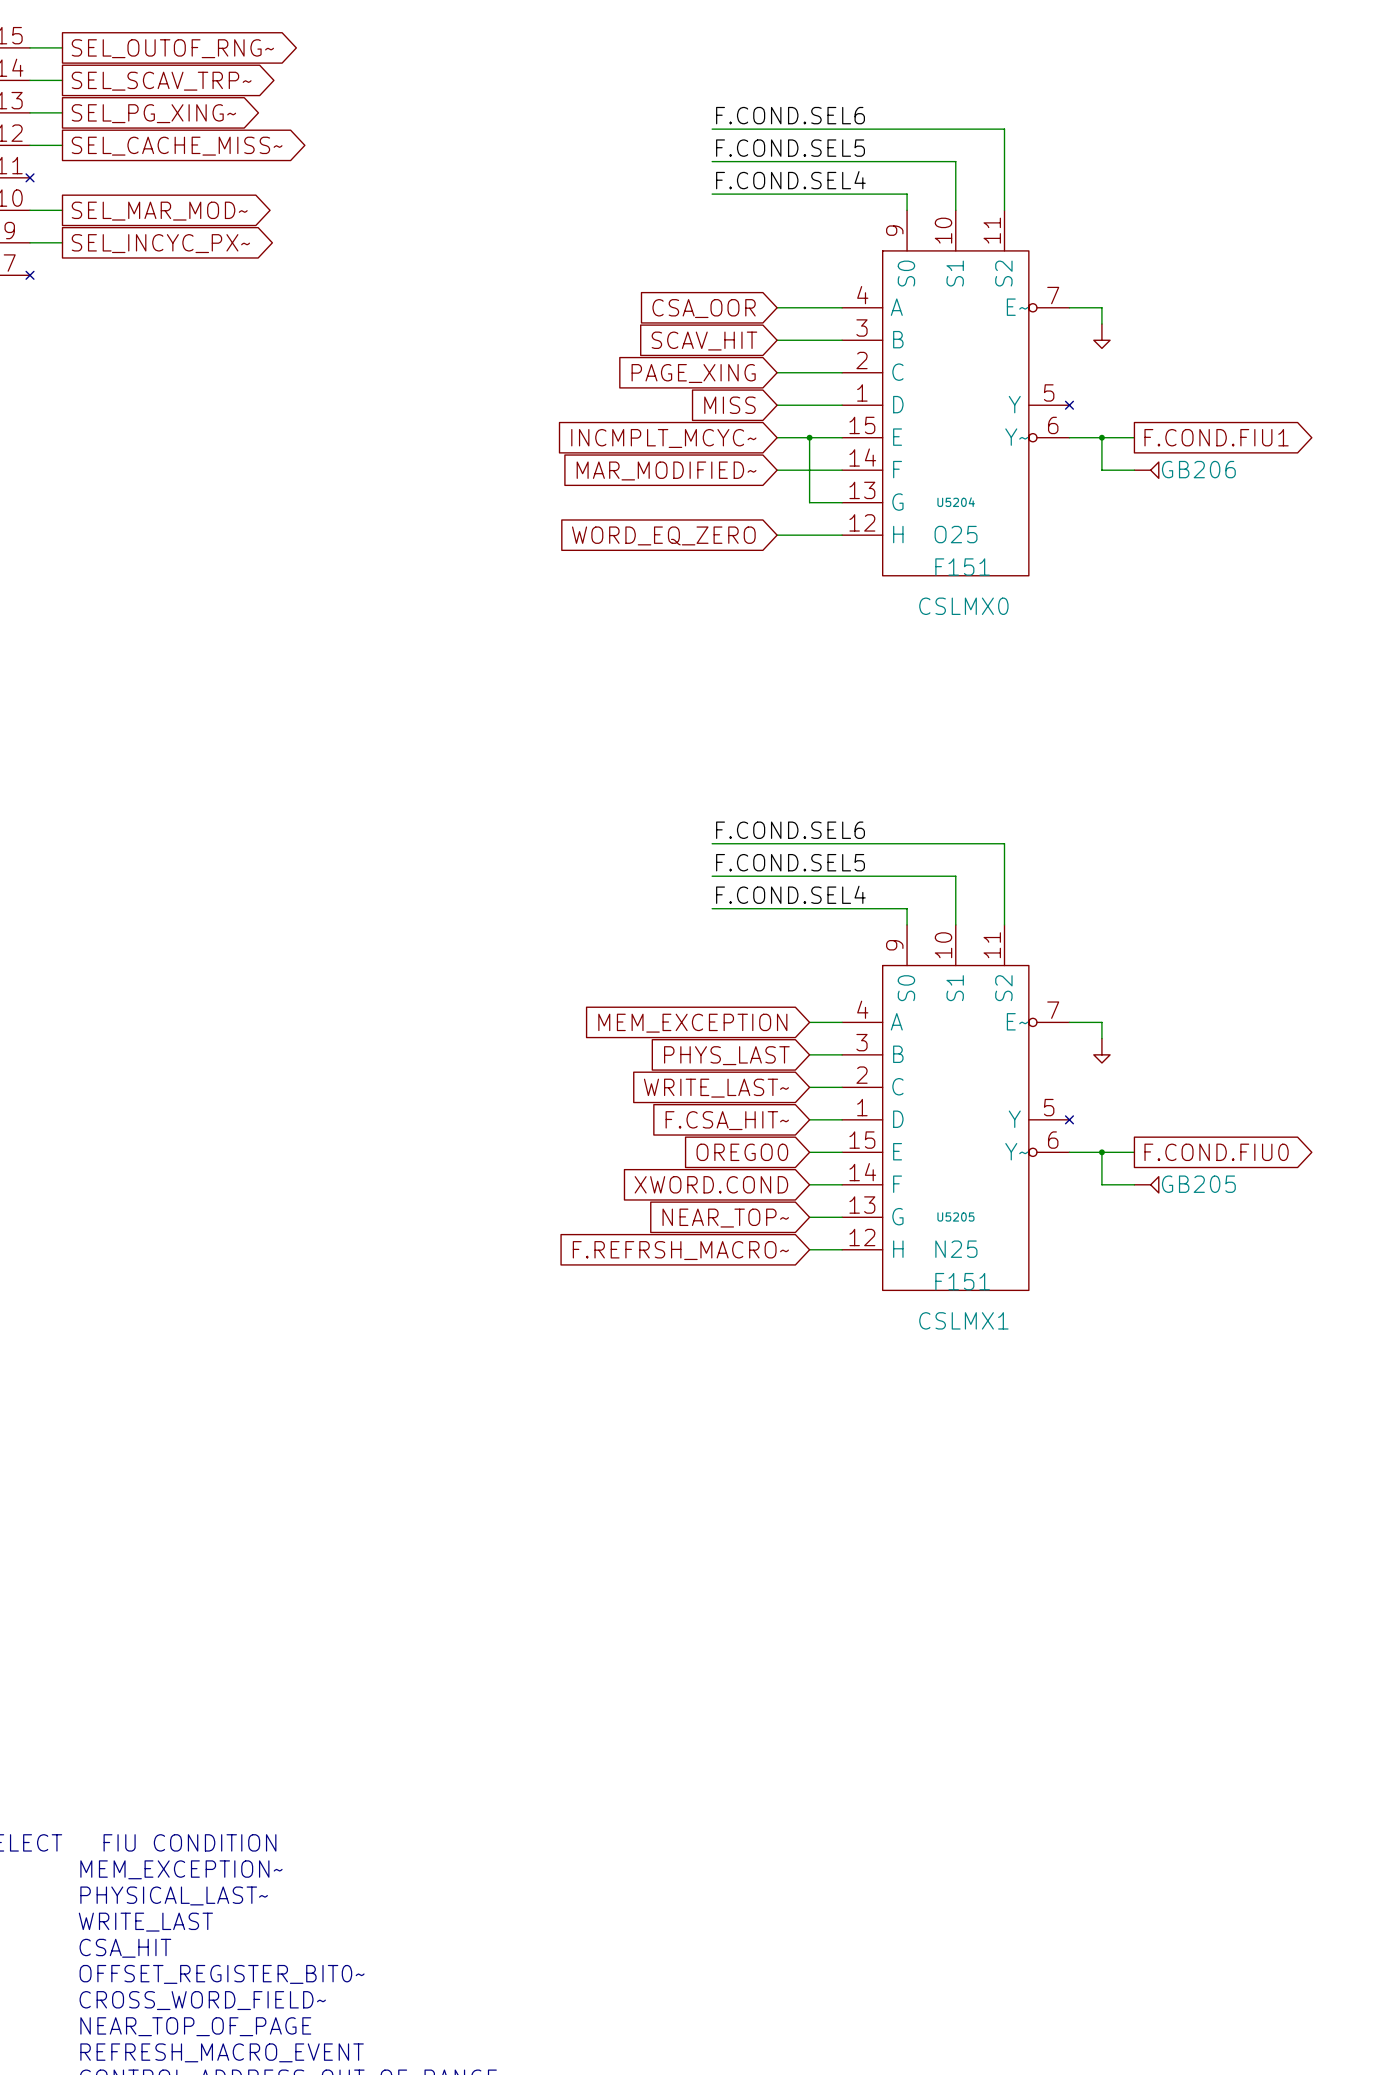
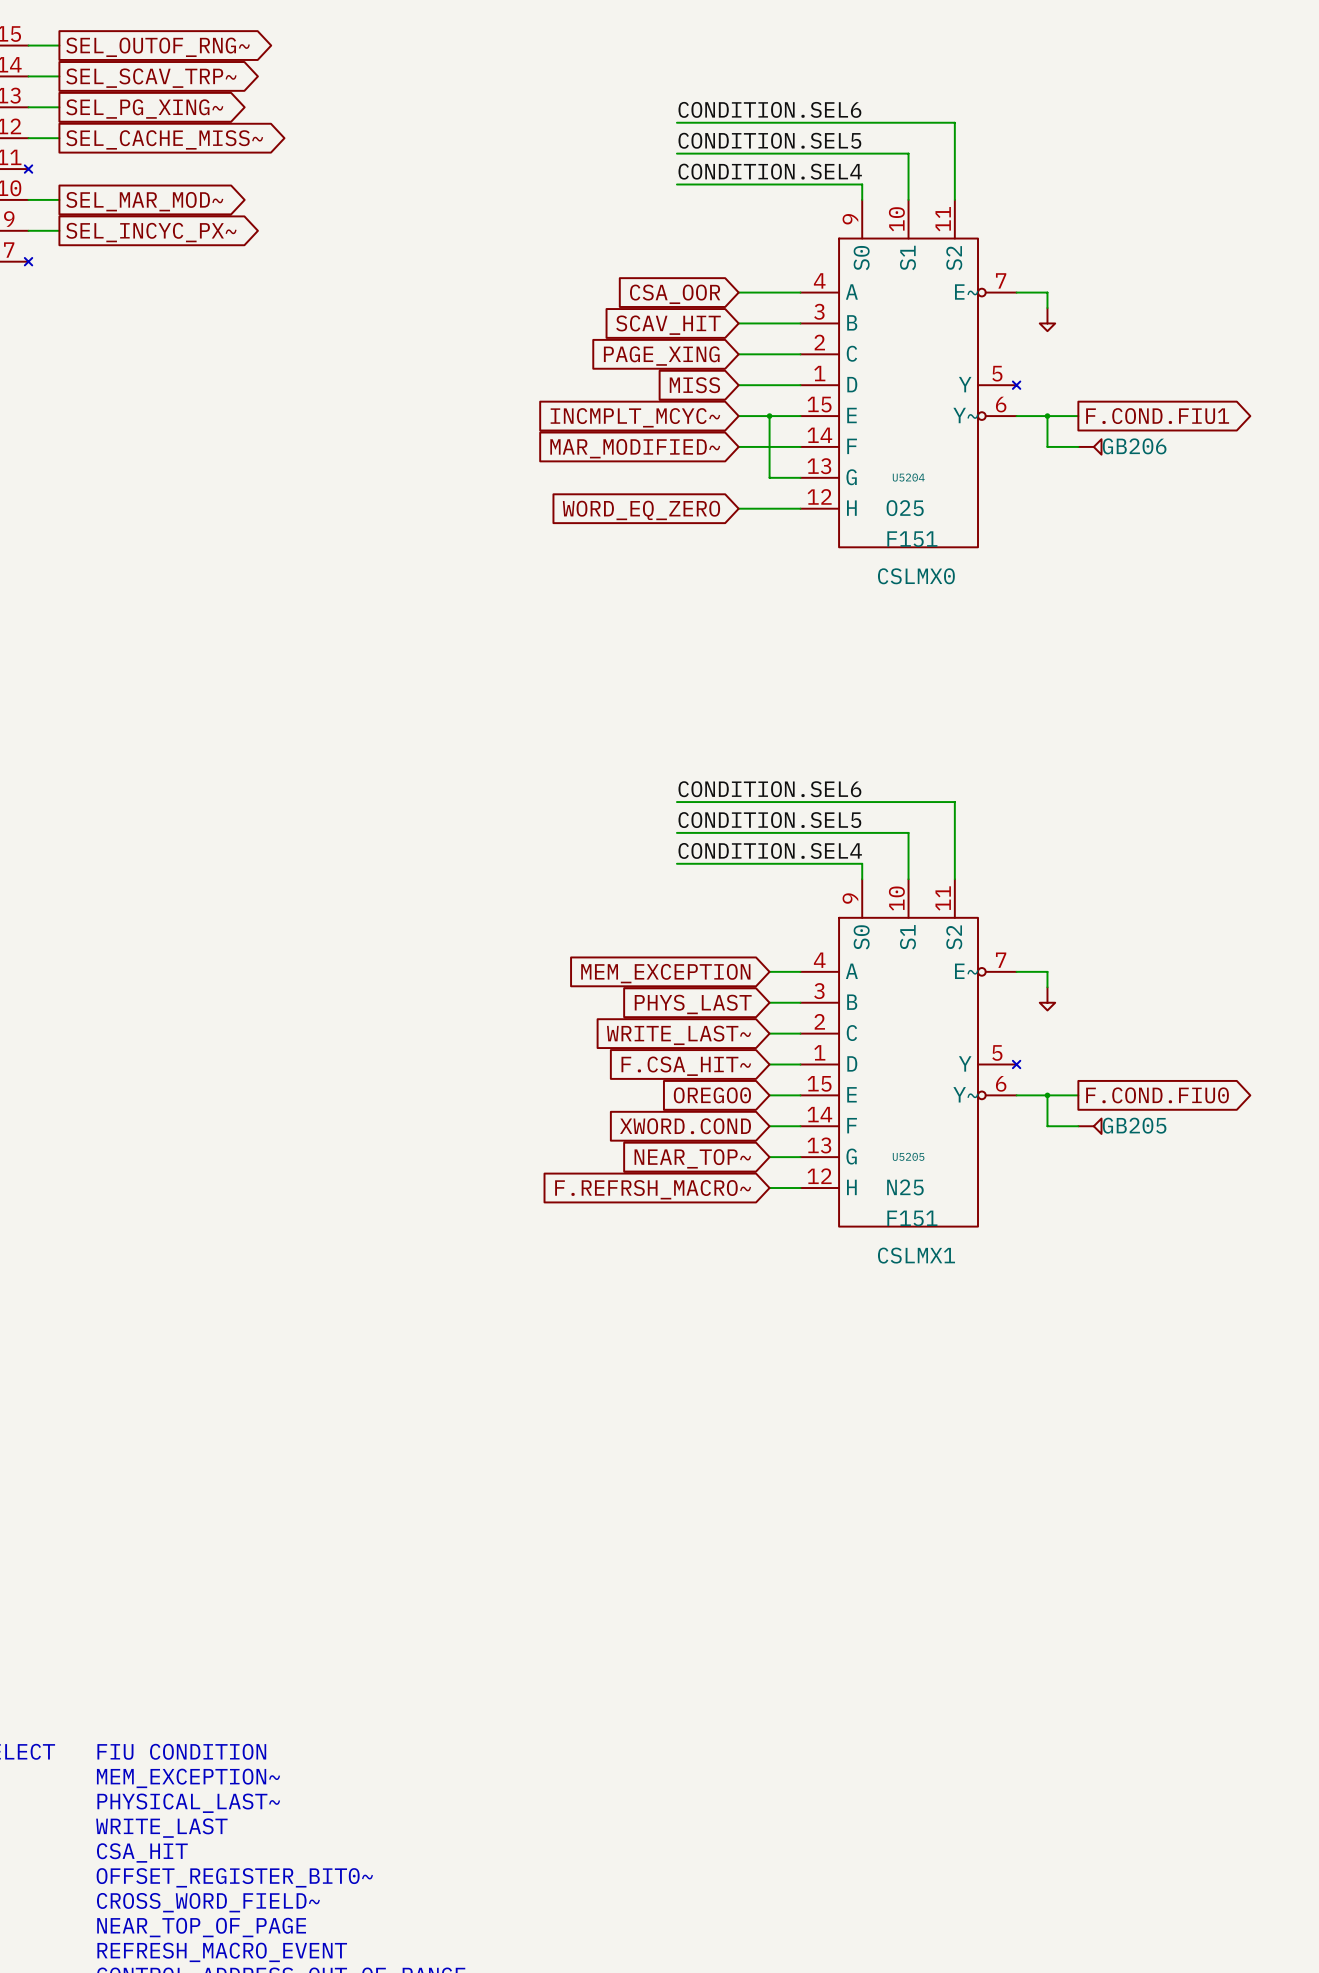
label: F.COND.SEL6 (790, 115) -> CONDITION.SEL6 (769, 109)
label: F.COND.SEL5 (790, 148) -> CONDITION.SEL5 (769, 140)
label: F.COND.SEL4 (790, 180) -> CONDITION.SEL4 (770, 171)
label: F.COND.SEL6 (790, 830) -> CONDITION.SEL6 (769, 789)
label: F.COND.SEL5 (790, 862) -> CONDITION.SEL5 (769, 820)
label: F.COND.SEL4 (790, 894) -> CONDITION.SEL4 (770, 850)

